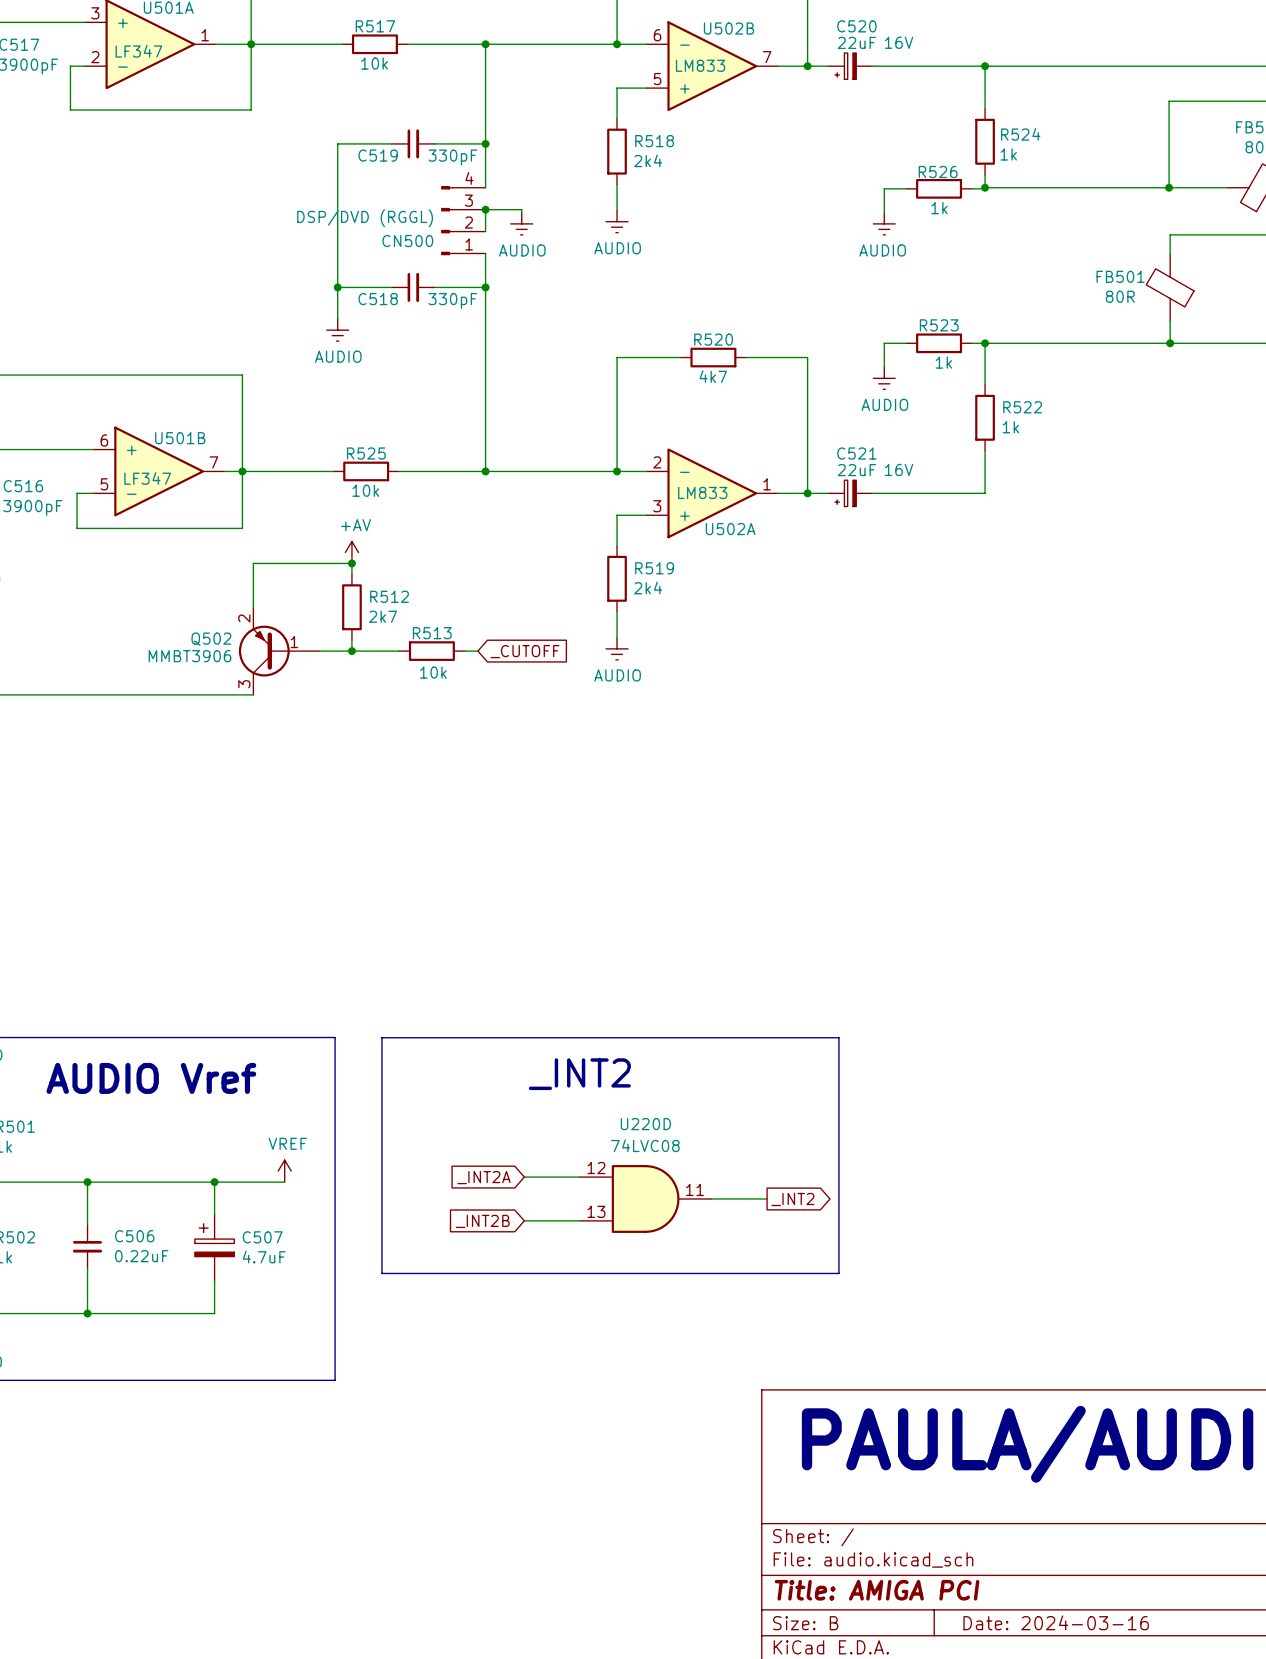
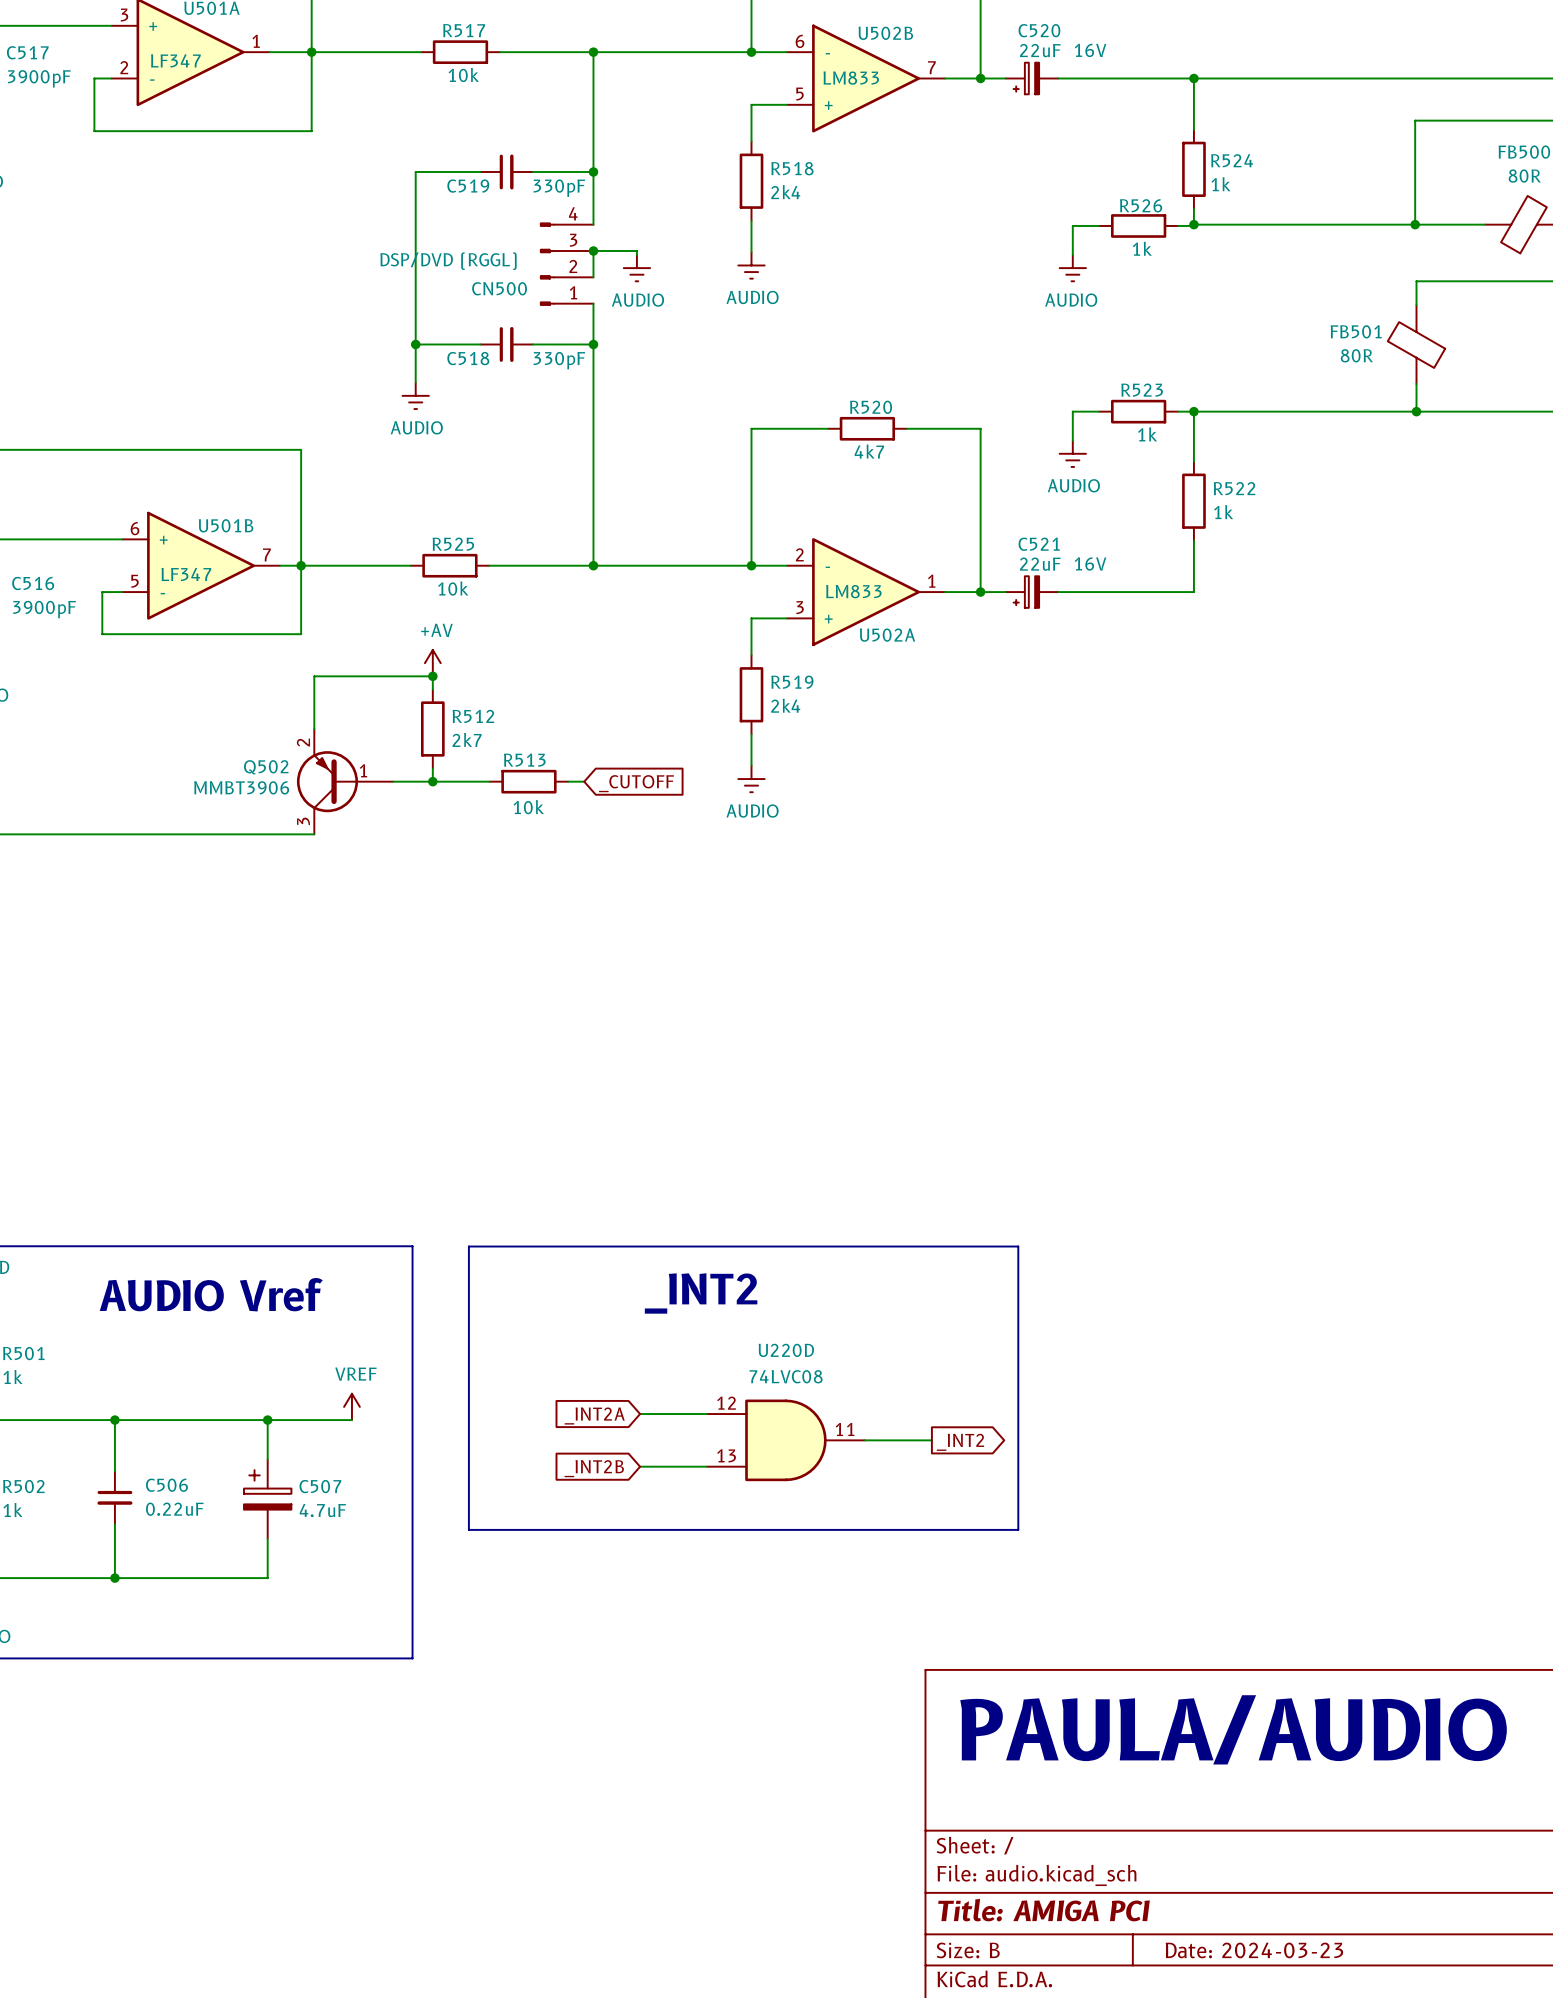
title block: Date: 2024-03-16 (1056, 1622) -> Date: 2024-03-23 (1254, 1950)

